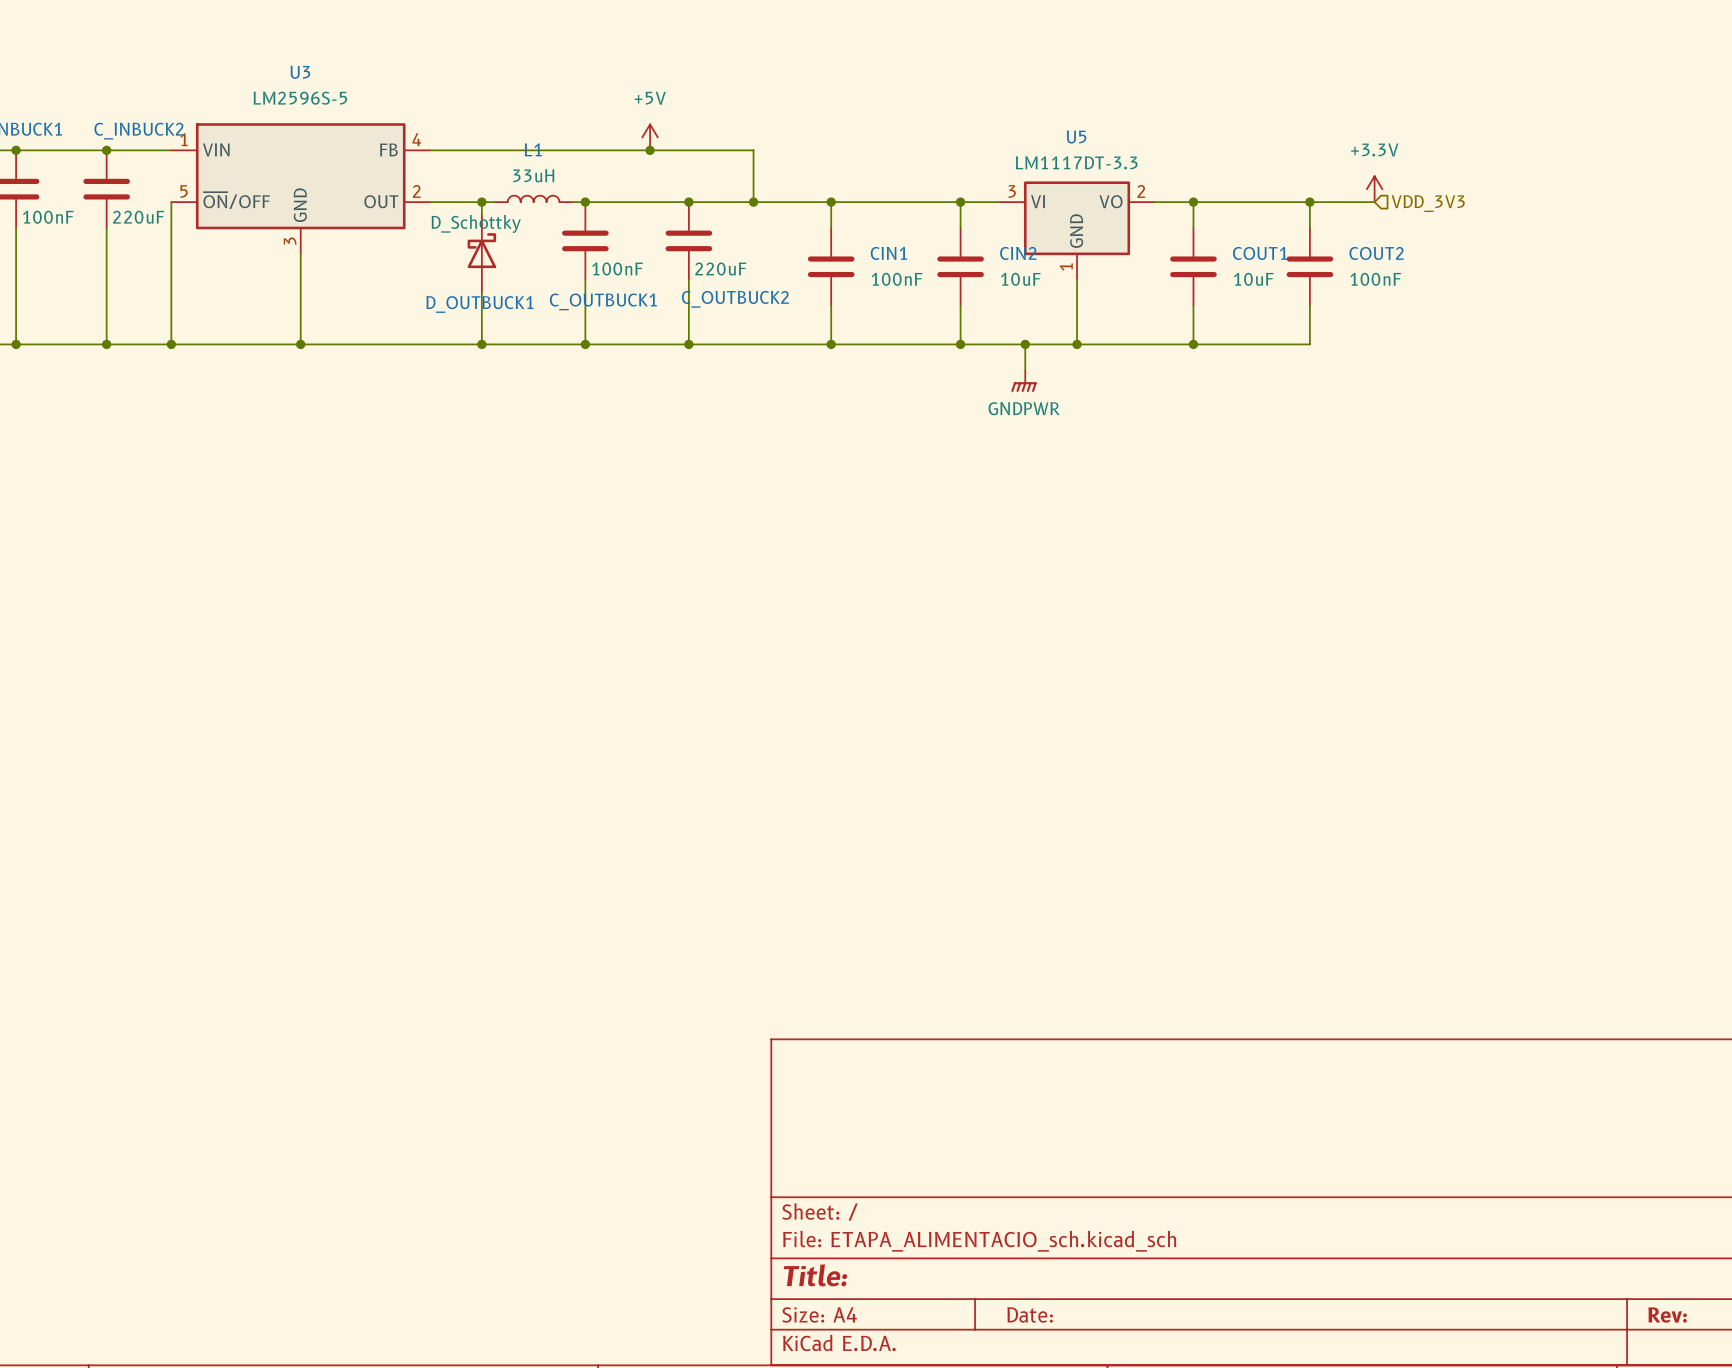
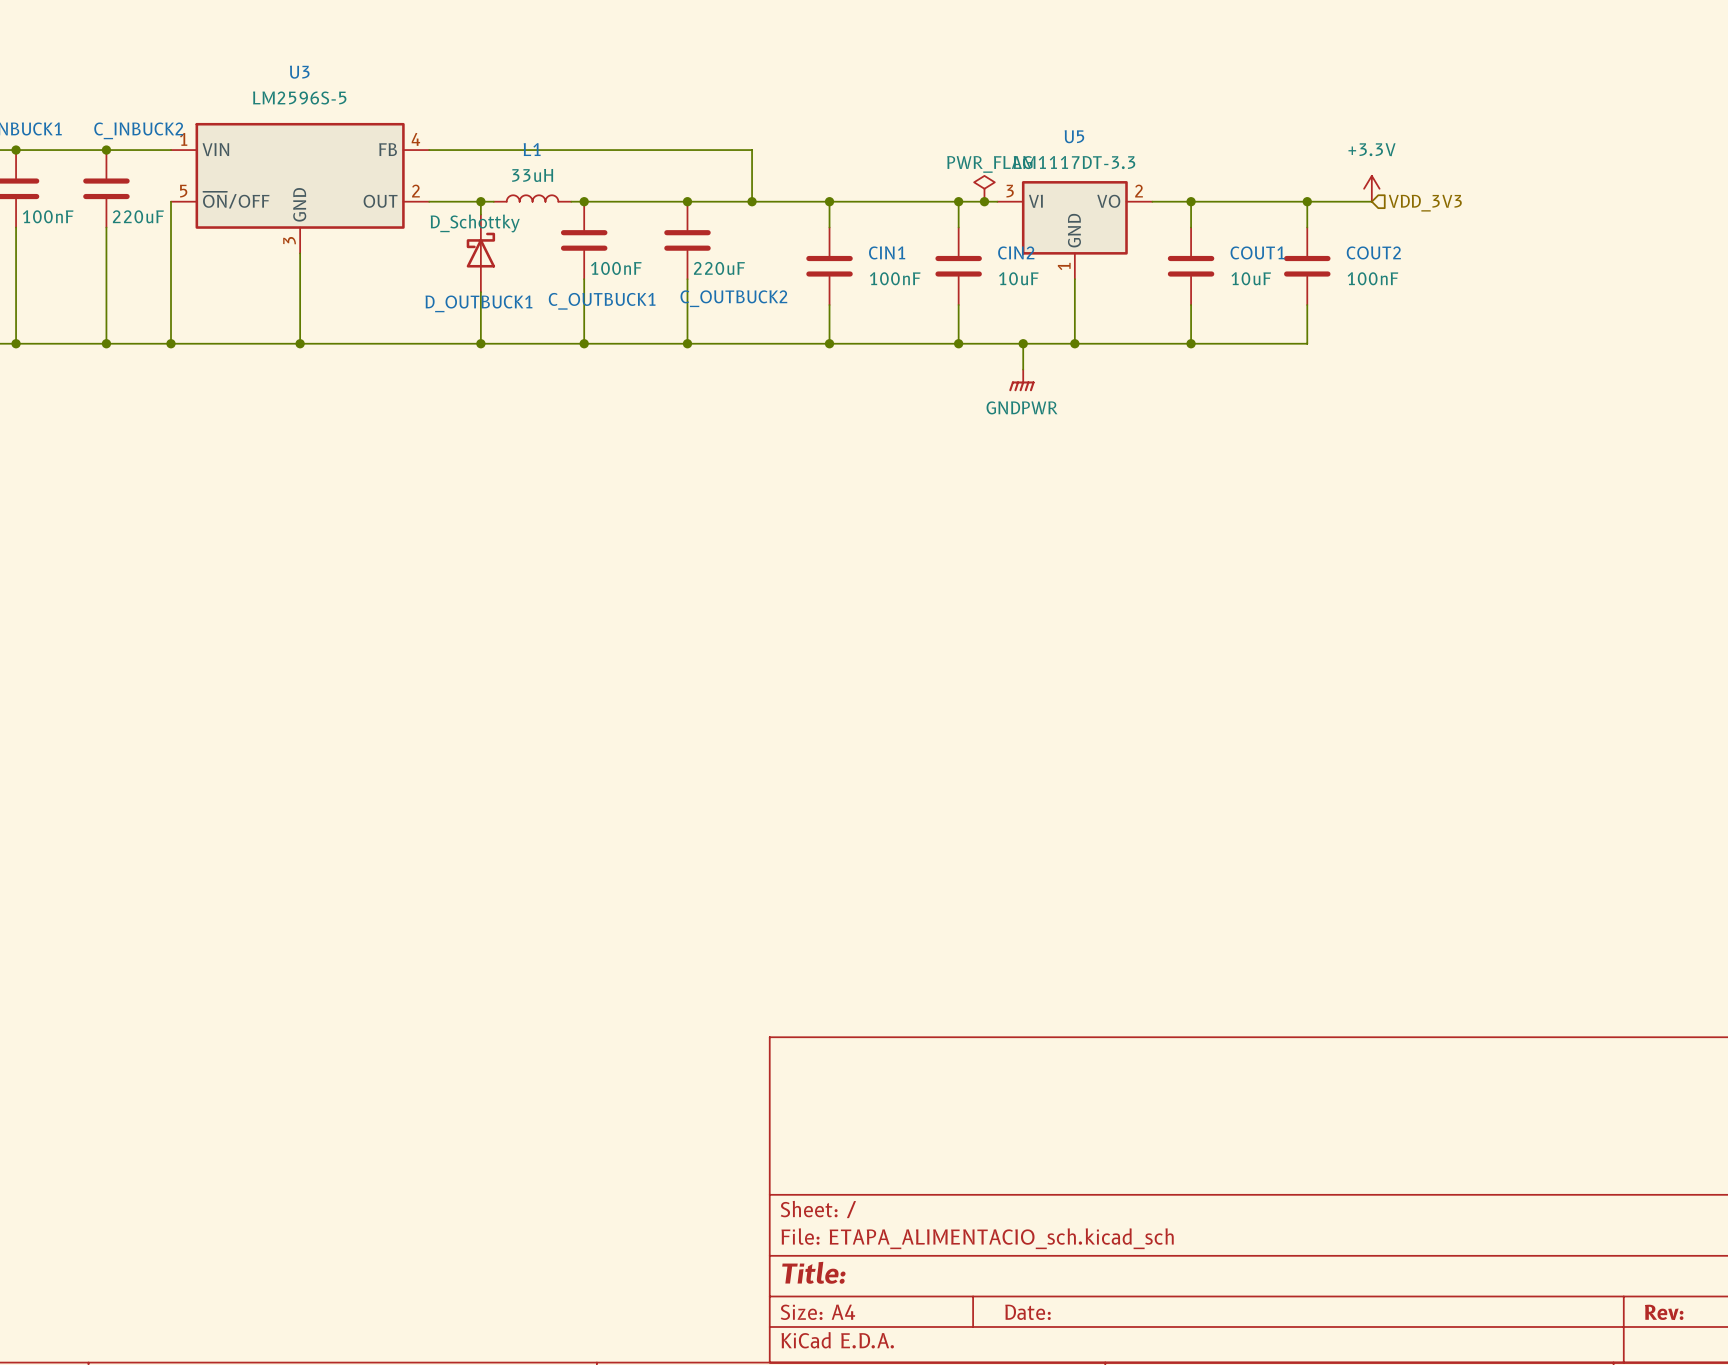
power symbol: +5V (650, 137) -> none
junction: (650, 150) -> none
power symbol: none -> PWR_FLAG (984, 188)
junction: none -> (984, 201)

